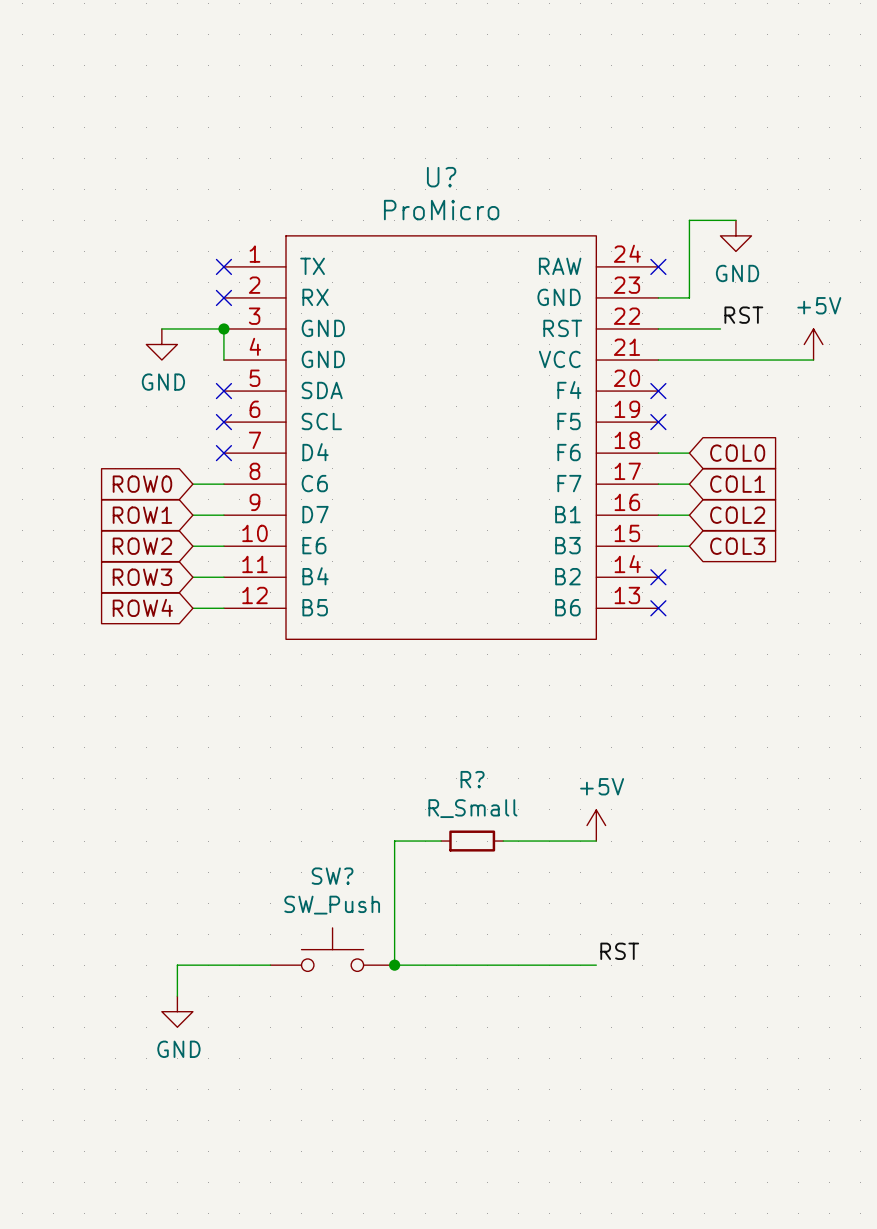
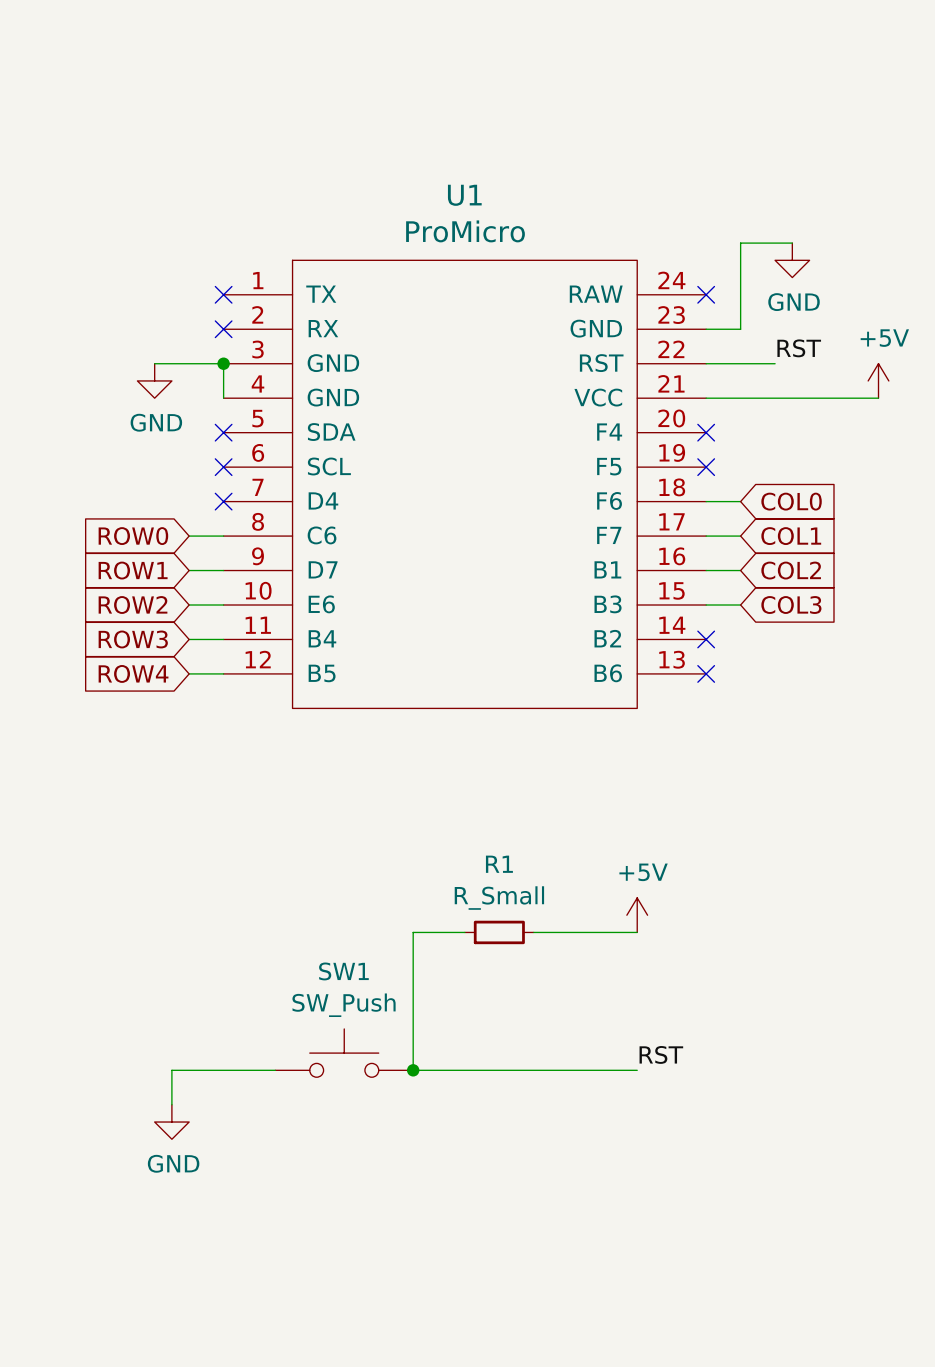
U? name: U? (441, 177) -> U1 (464, 195)
R? name: R? (472, 779) -> R1 (499, 864)
SW? name: SW? (332, 876) -> SW1 (343, 971)

